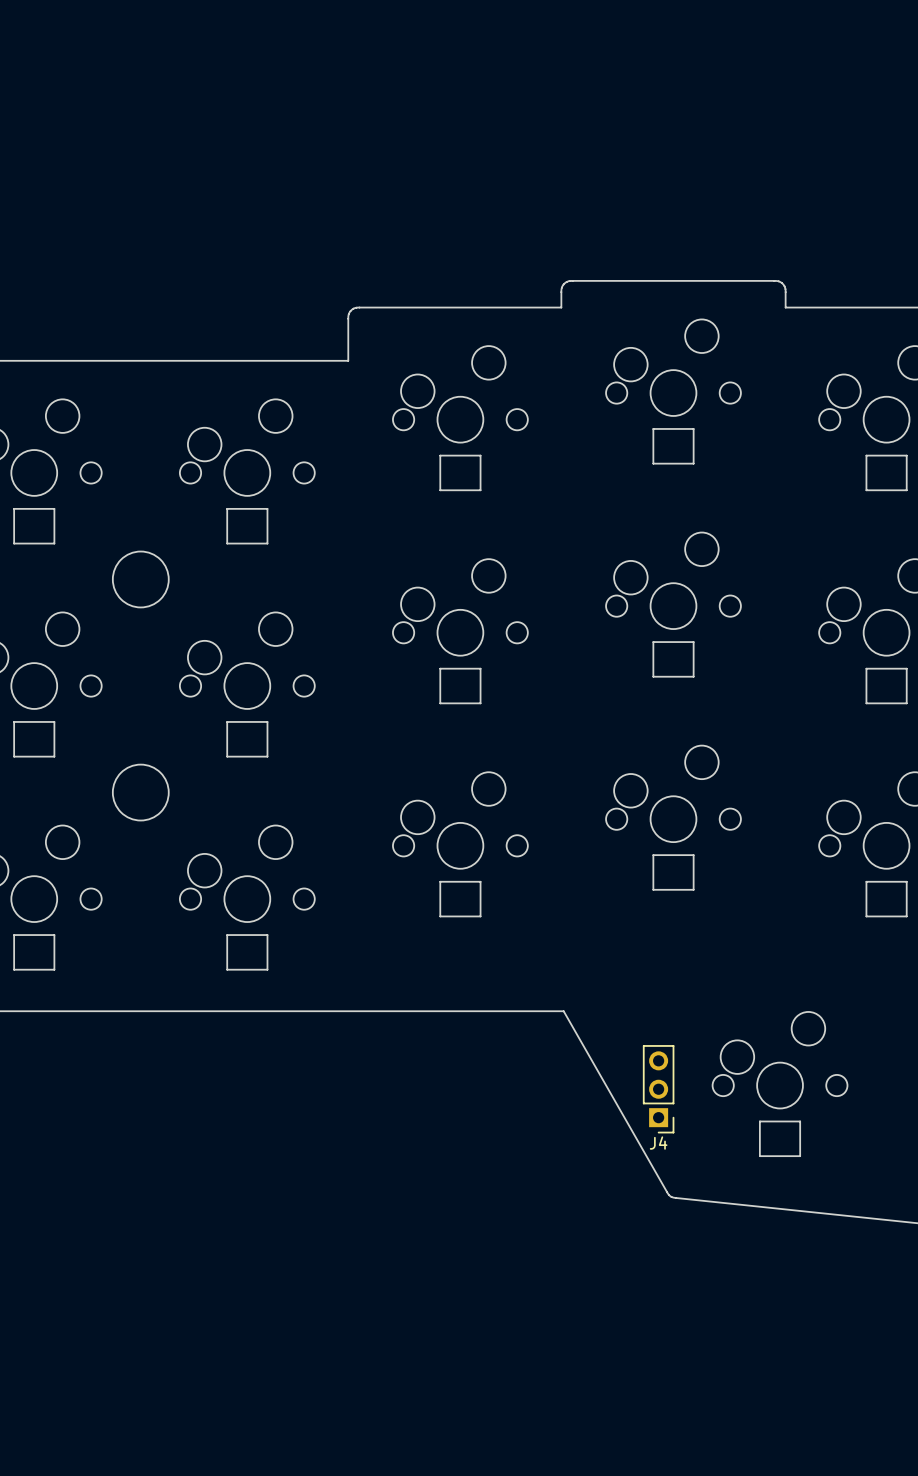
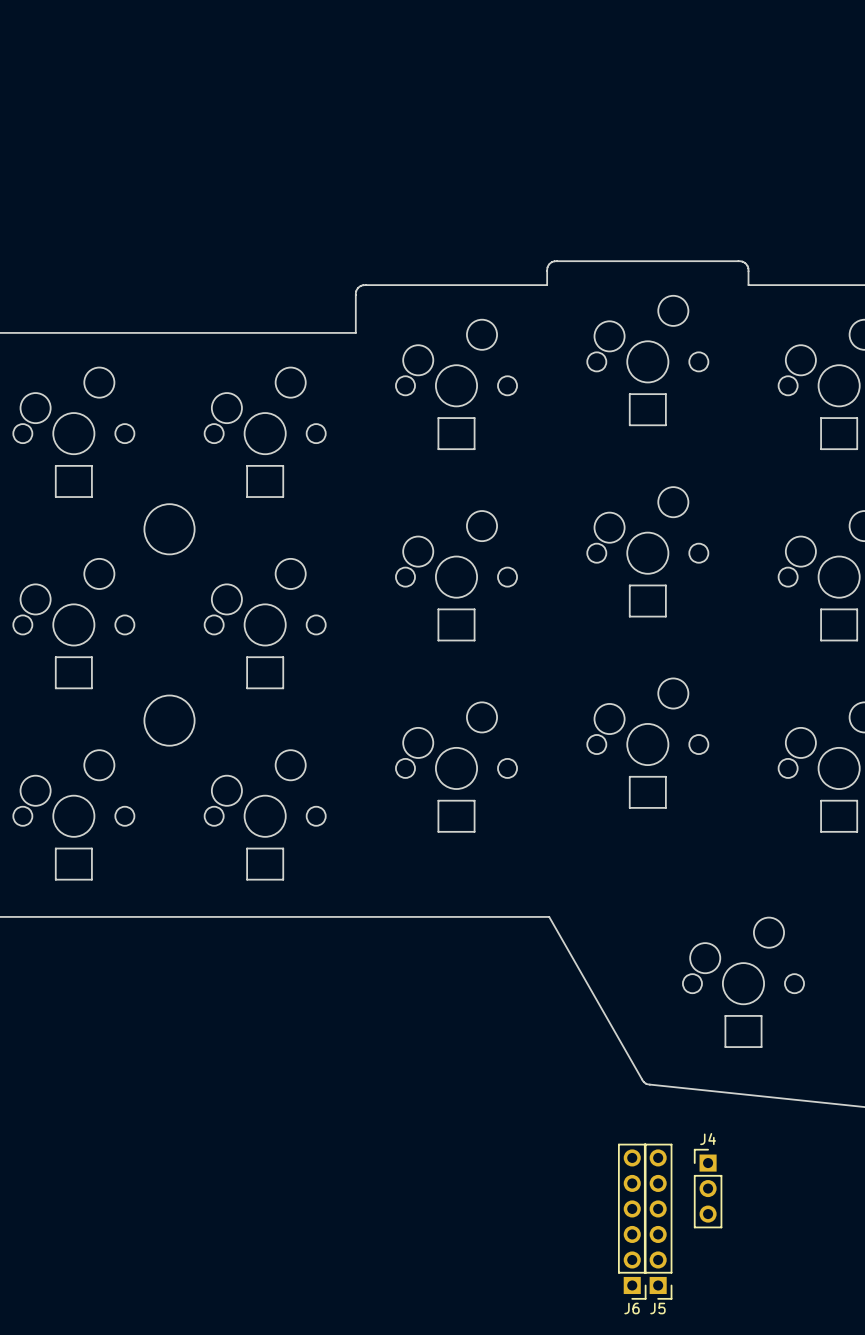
J4 rotation: 0° (658, 1089) -> 180° (708, 1188)
J4 position: (658, 1089) -> (708, 1188)
J6: none -> (632, 1221)
J5: none -> (658, 1221)

